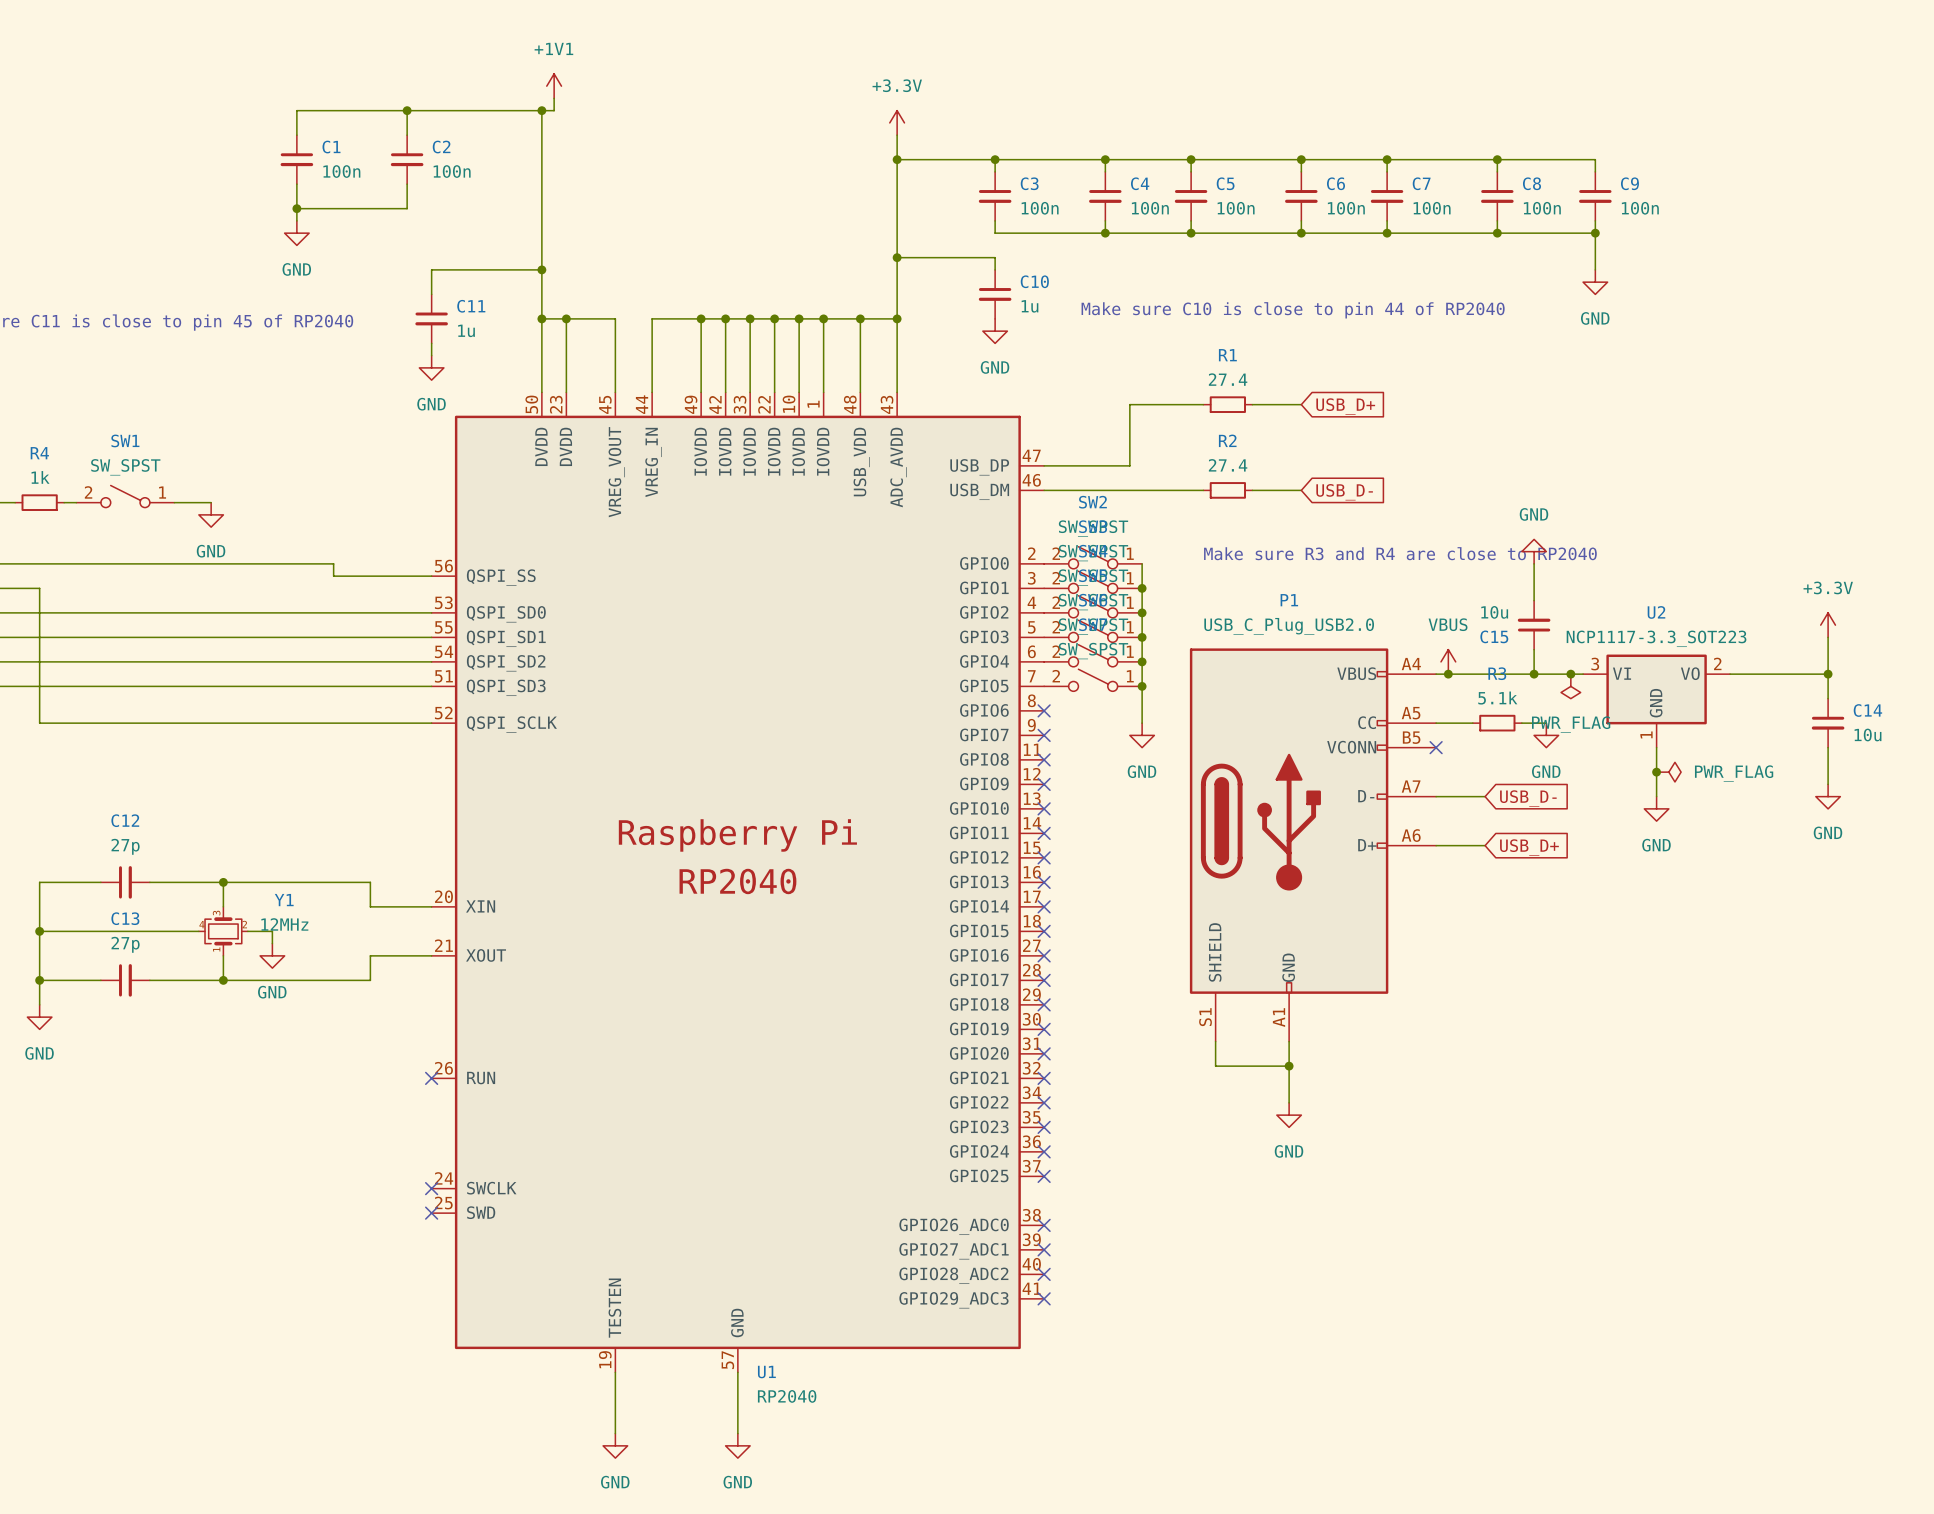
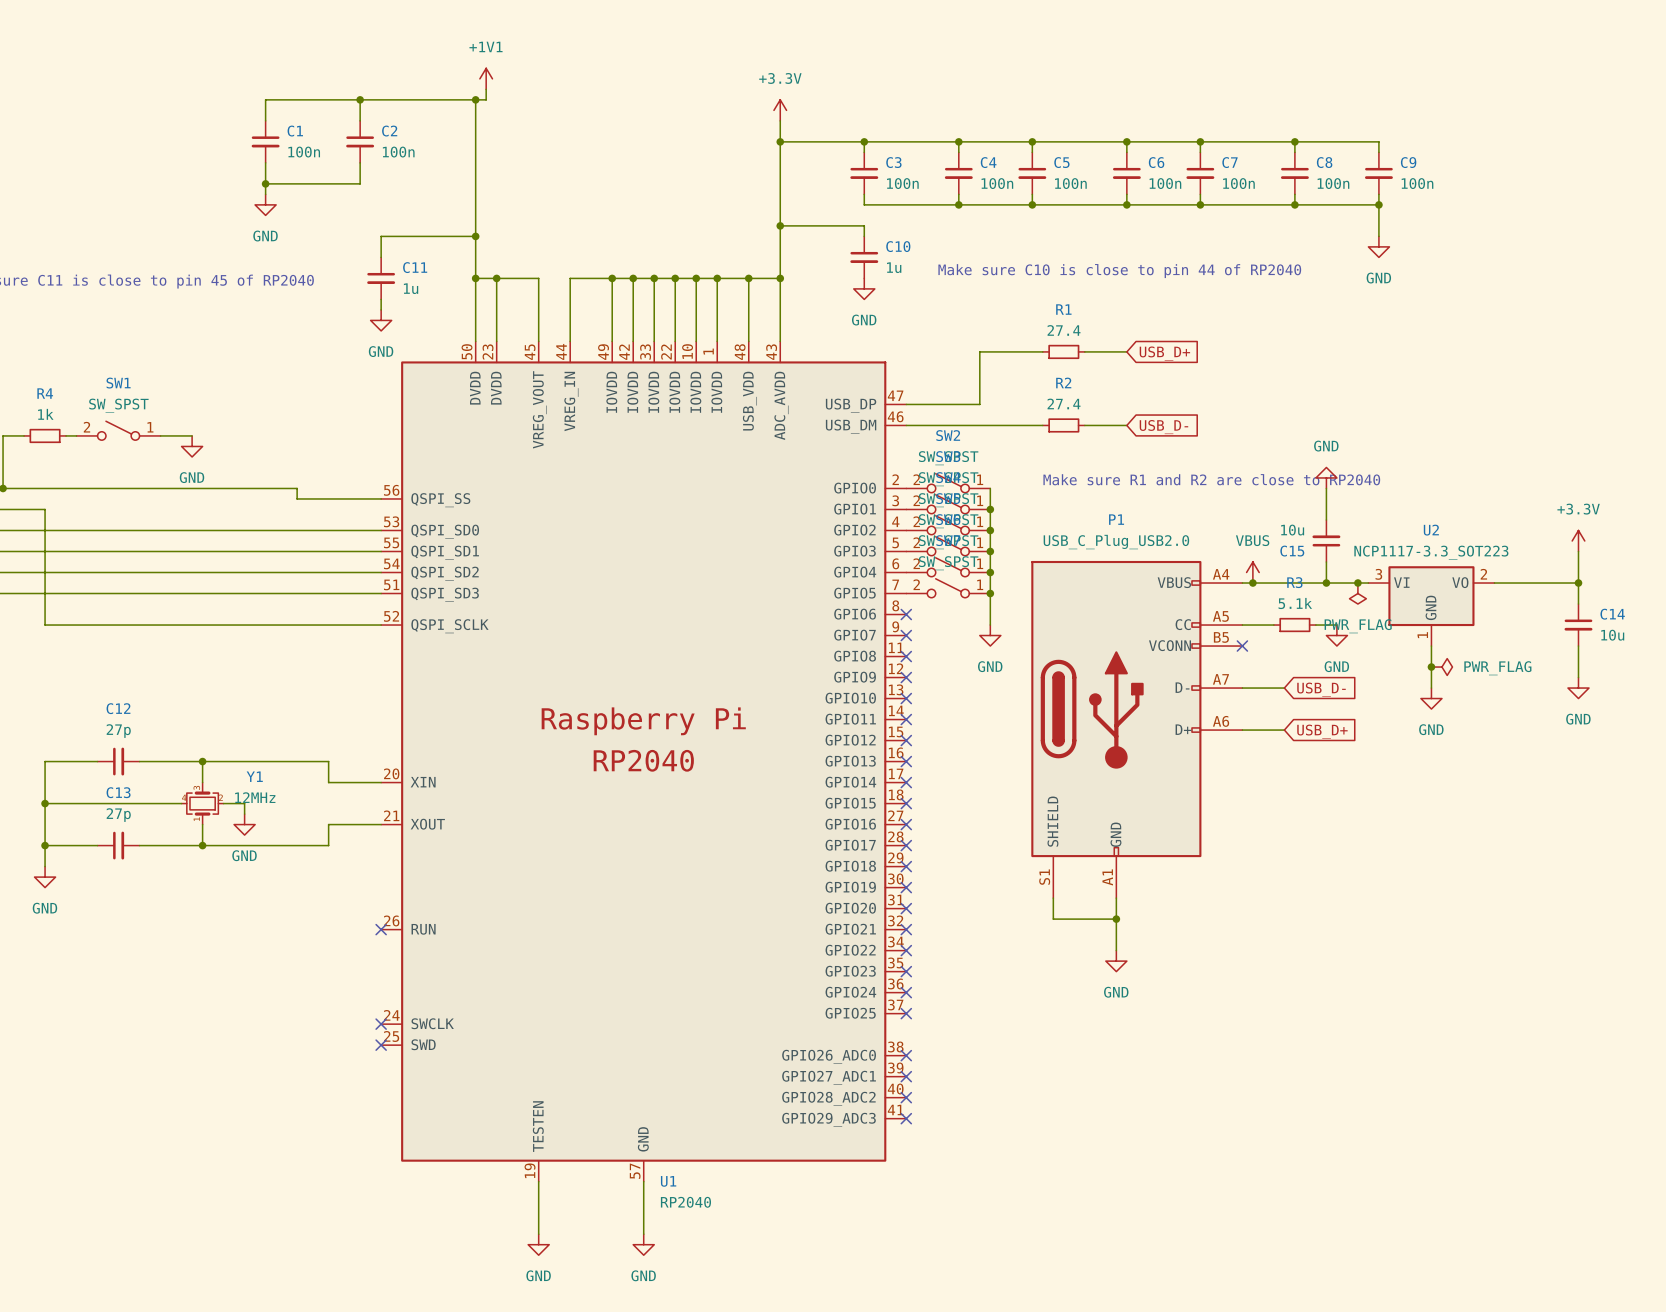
text: Make sure R3 and R4 are close to RP2040 (1400, 553) -> Make sure R1 and R2 are close to RP2040 (1211, 479)

